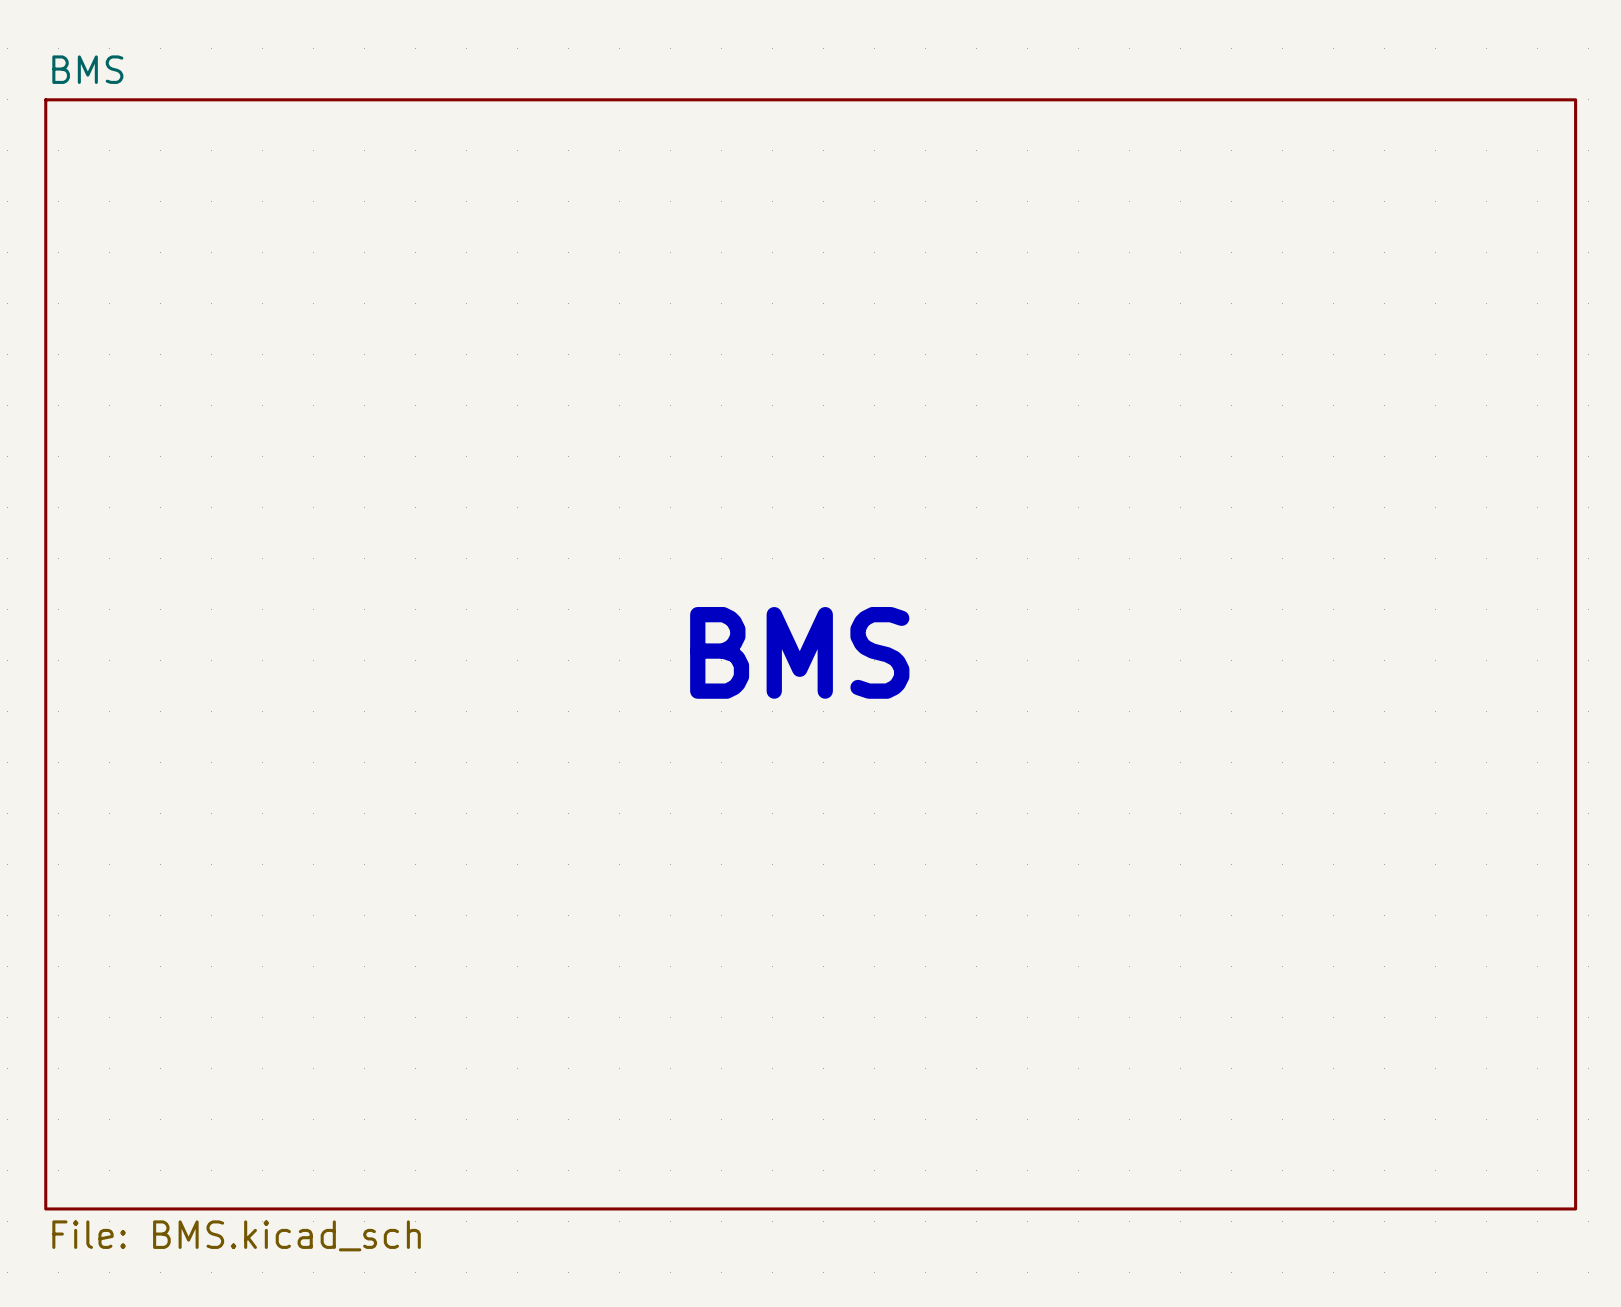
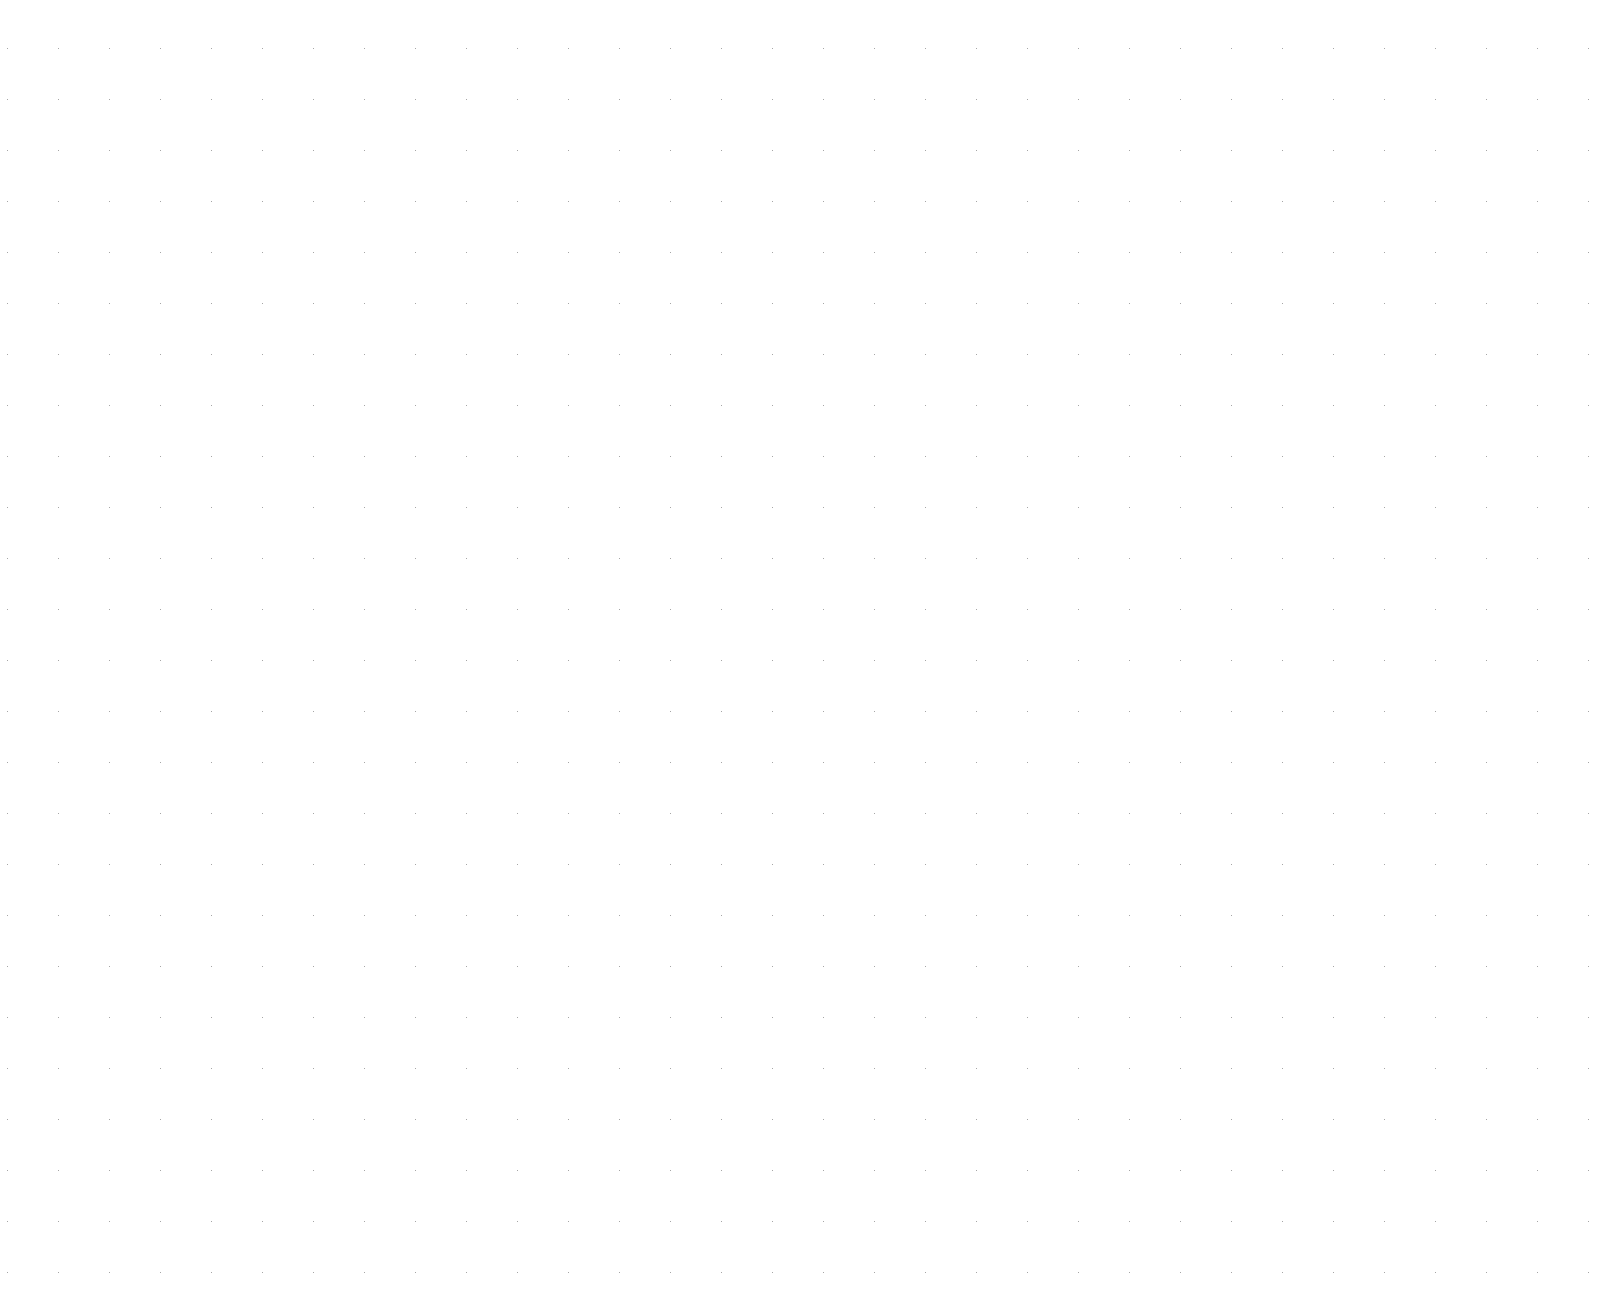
text: BMS (799, 652) -> none
sheet BMS: File: BMS.kicad_sch (810, 654) -> none

